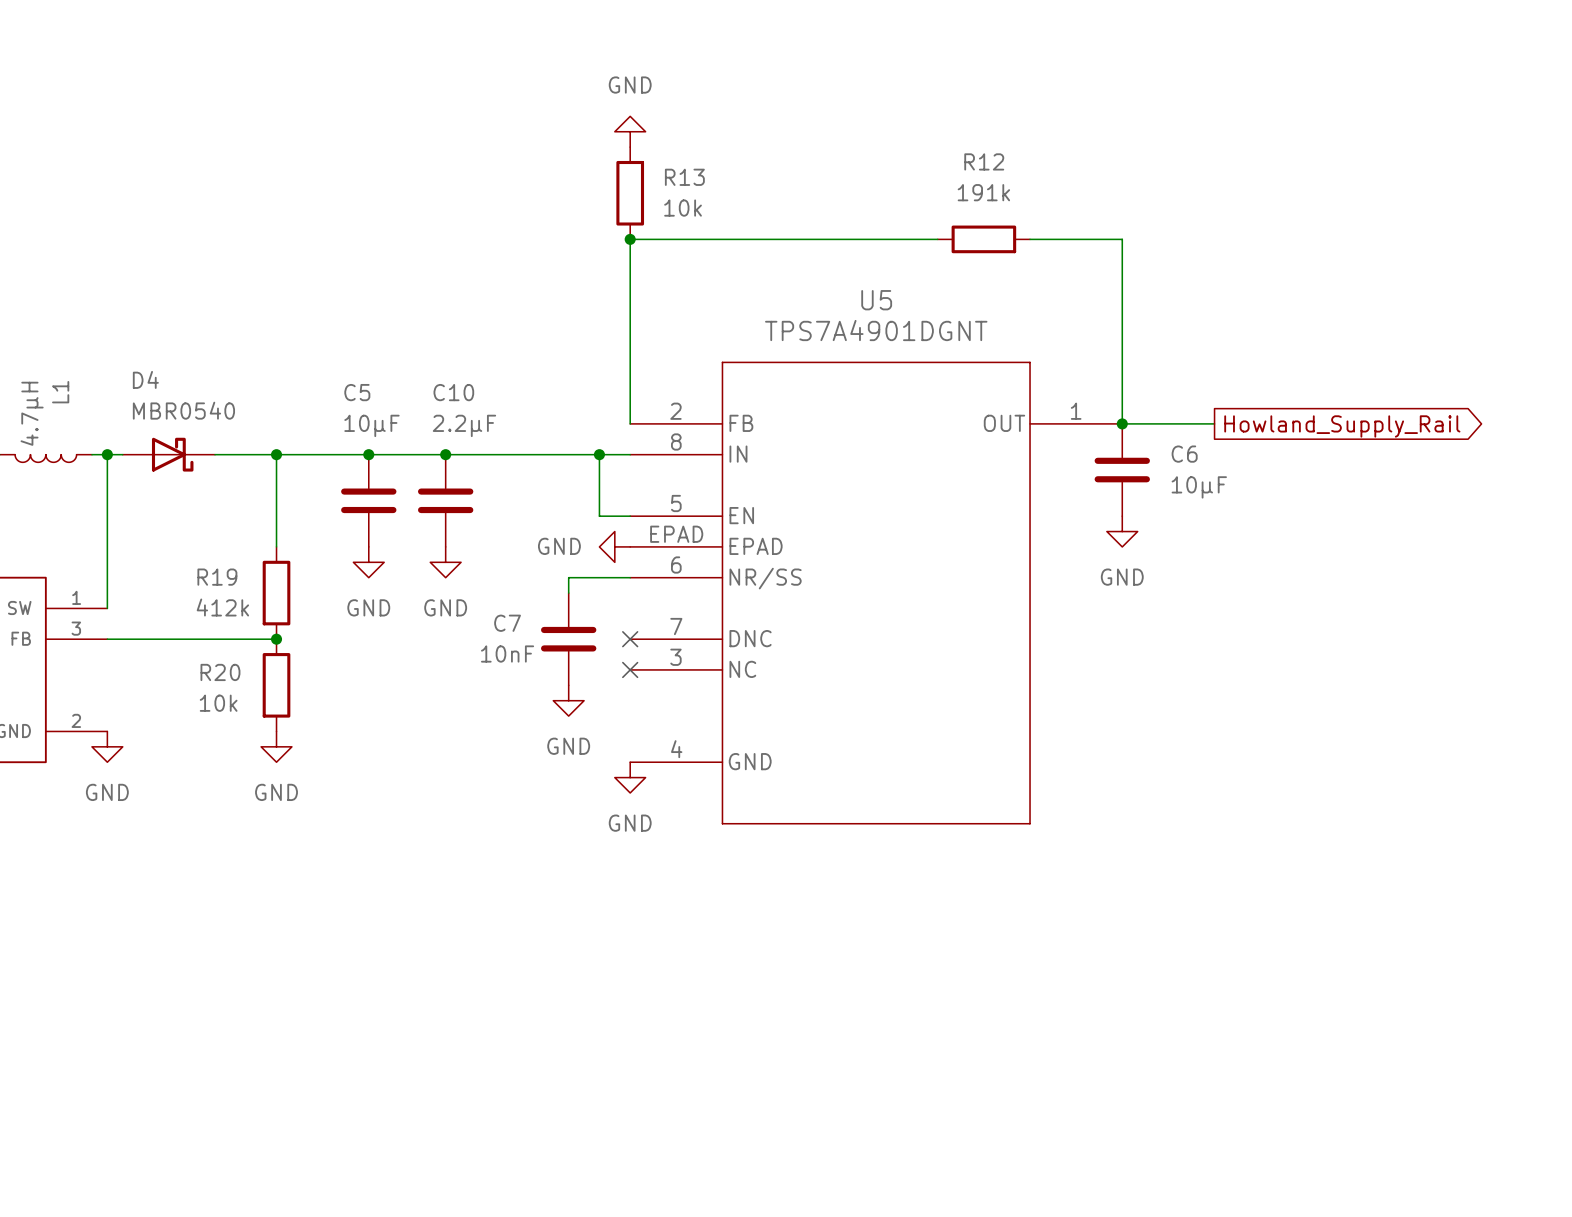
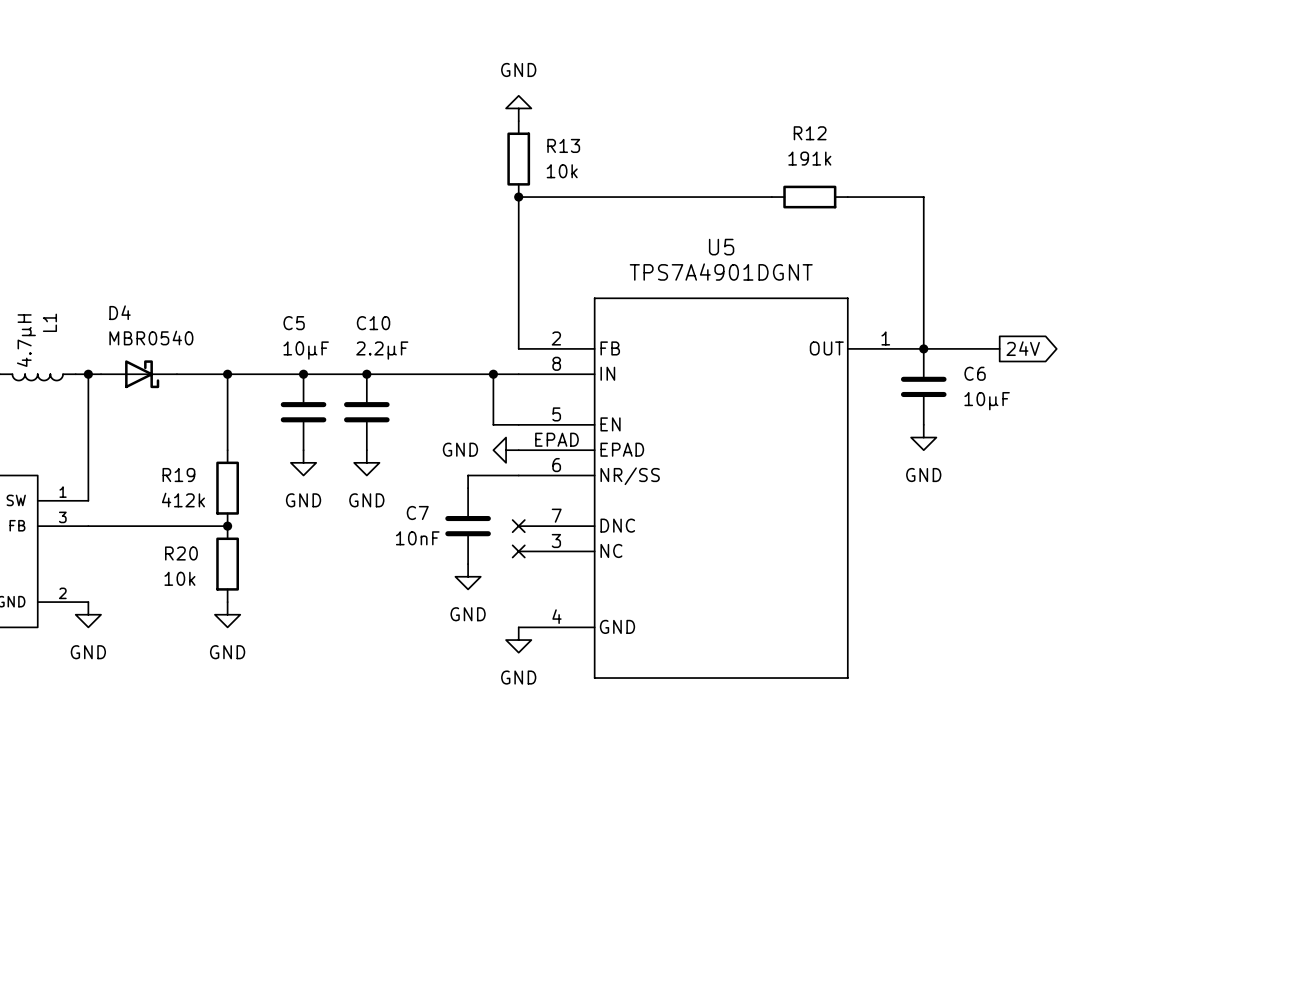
global label: Howland_Supply_Rail (1342, 426) -> 24V (1023, 348)

